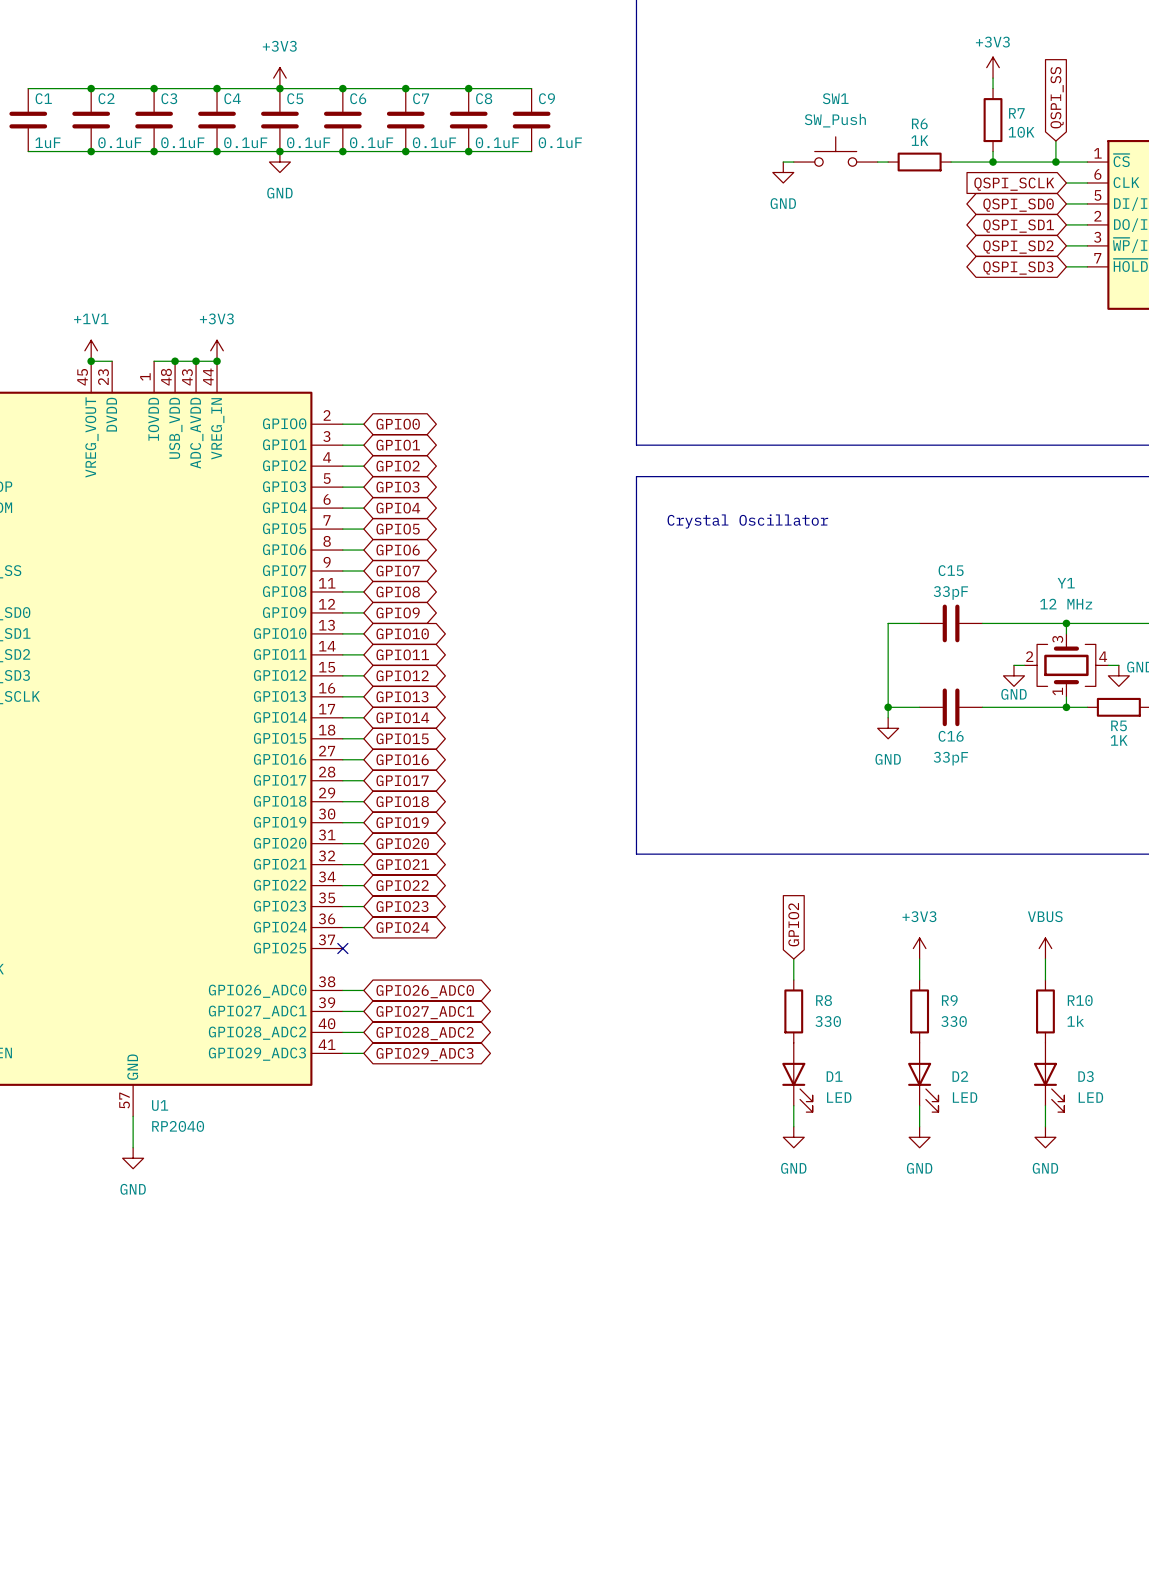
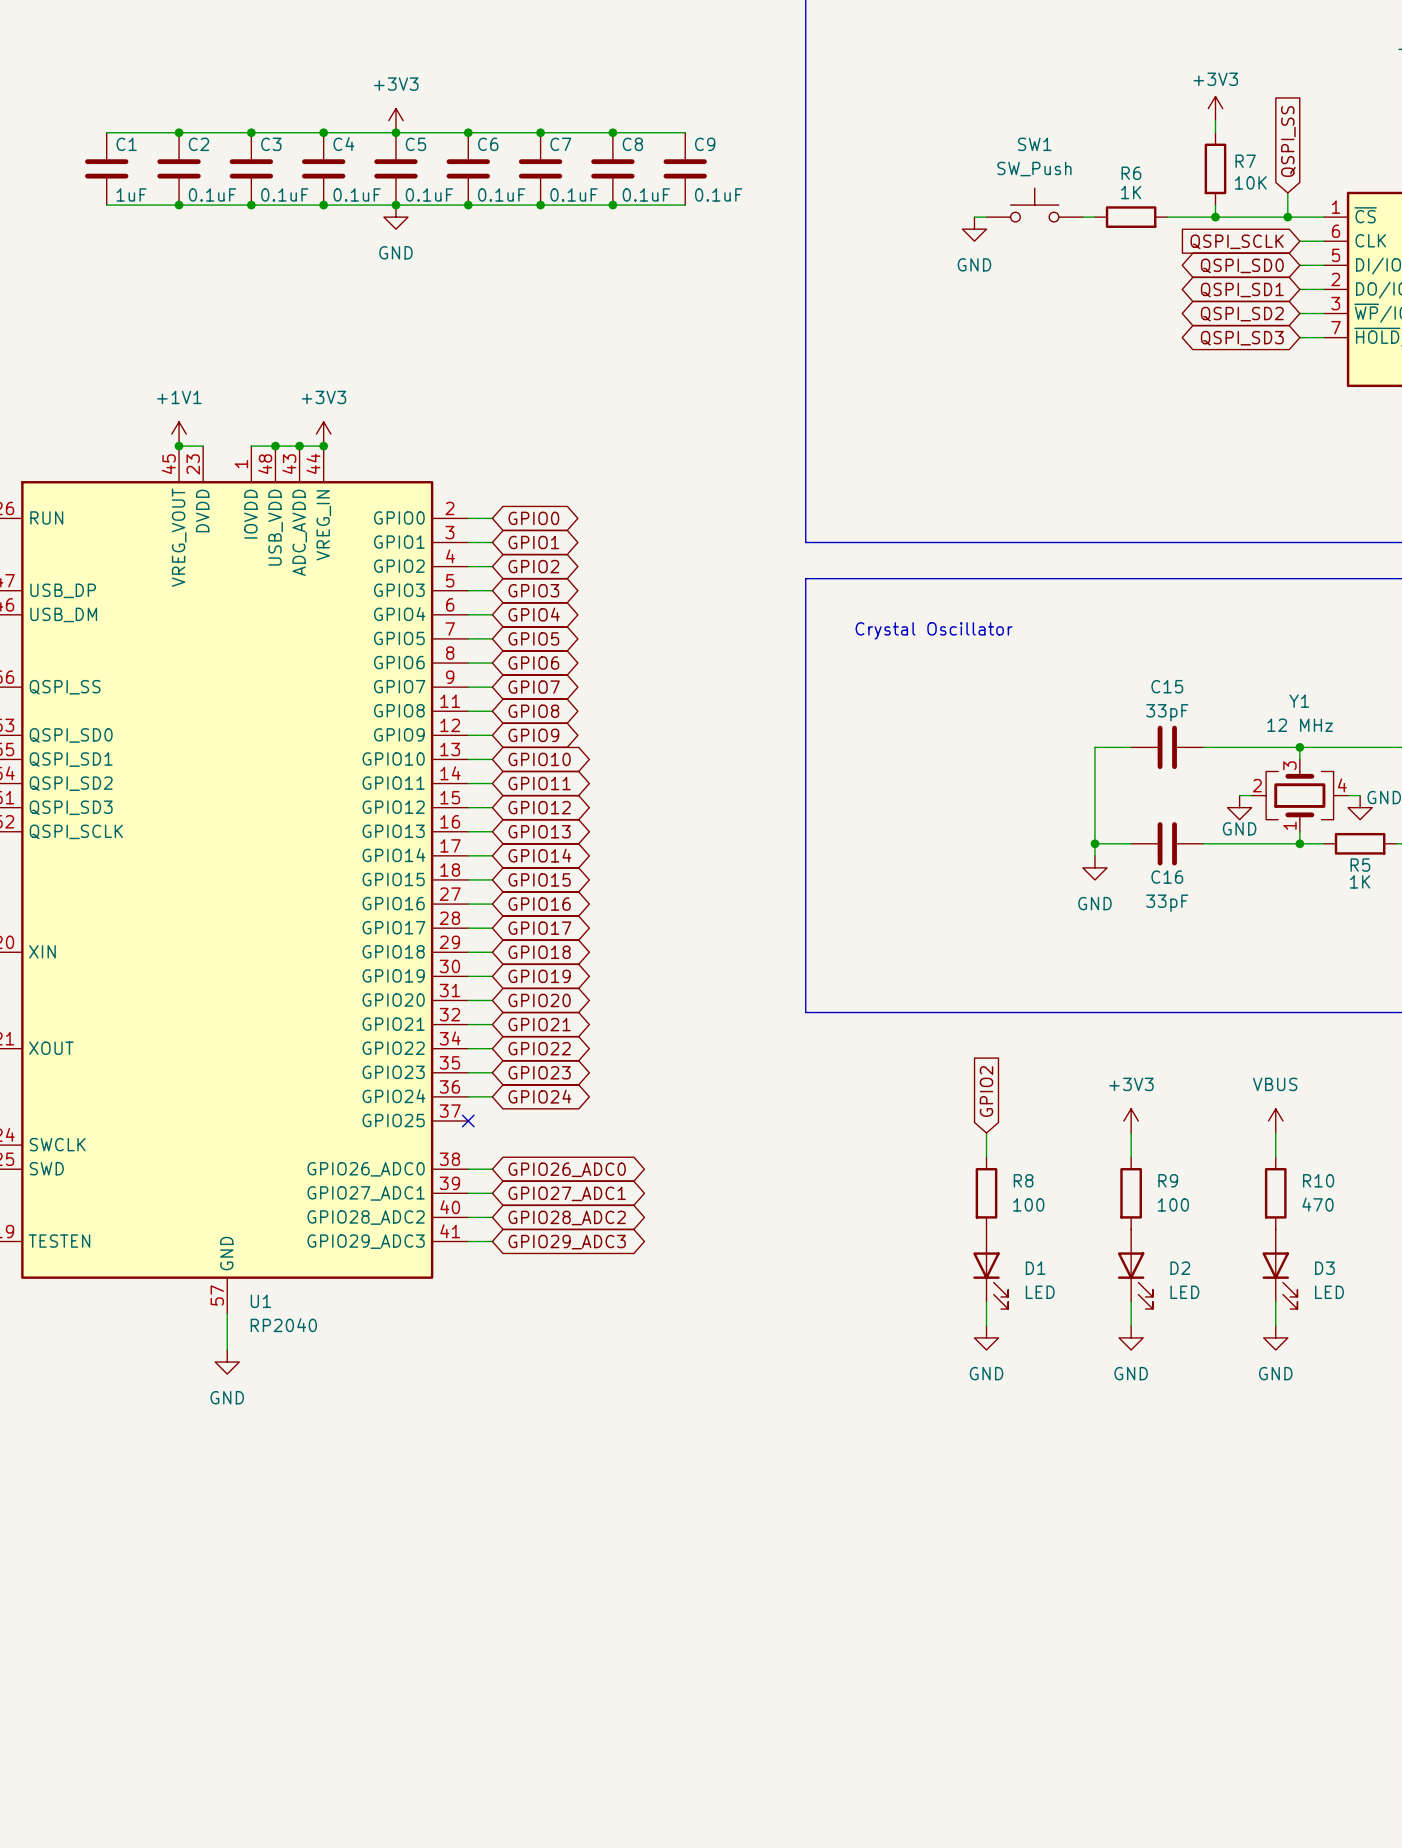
R8 value: 330 (828, 1021) -> 100 (1028, 1204)
R9 value: 330 (954, 1021) -> 100 (1173, 1204)
R10 value: 1k (1075, 1021) -> 470 (1318, 1204)

